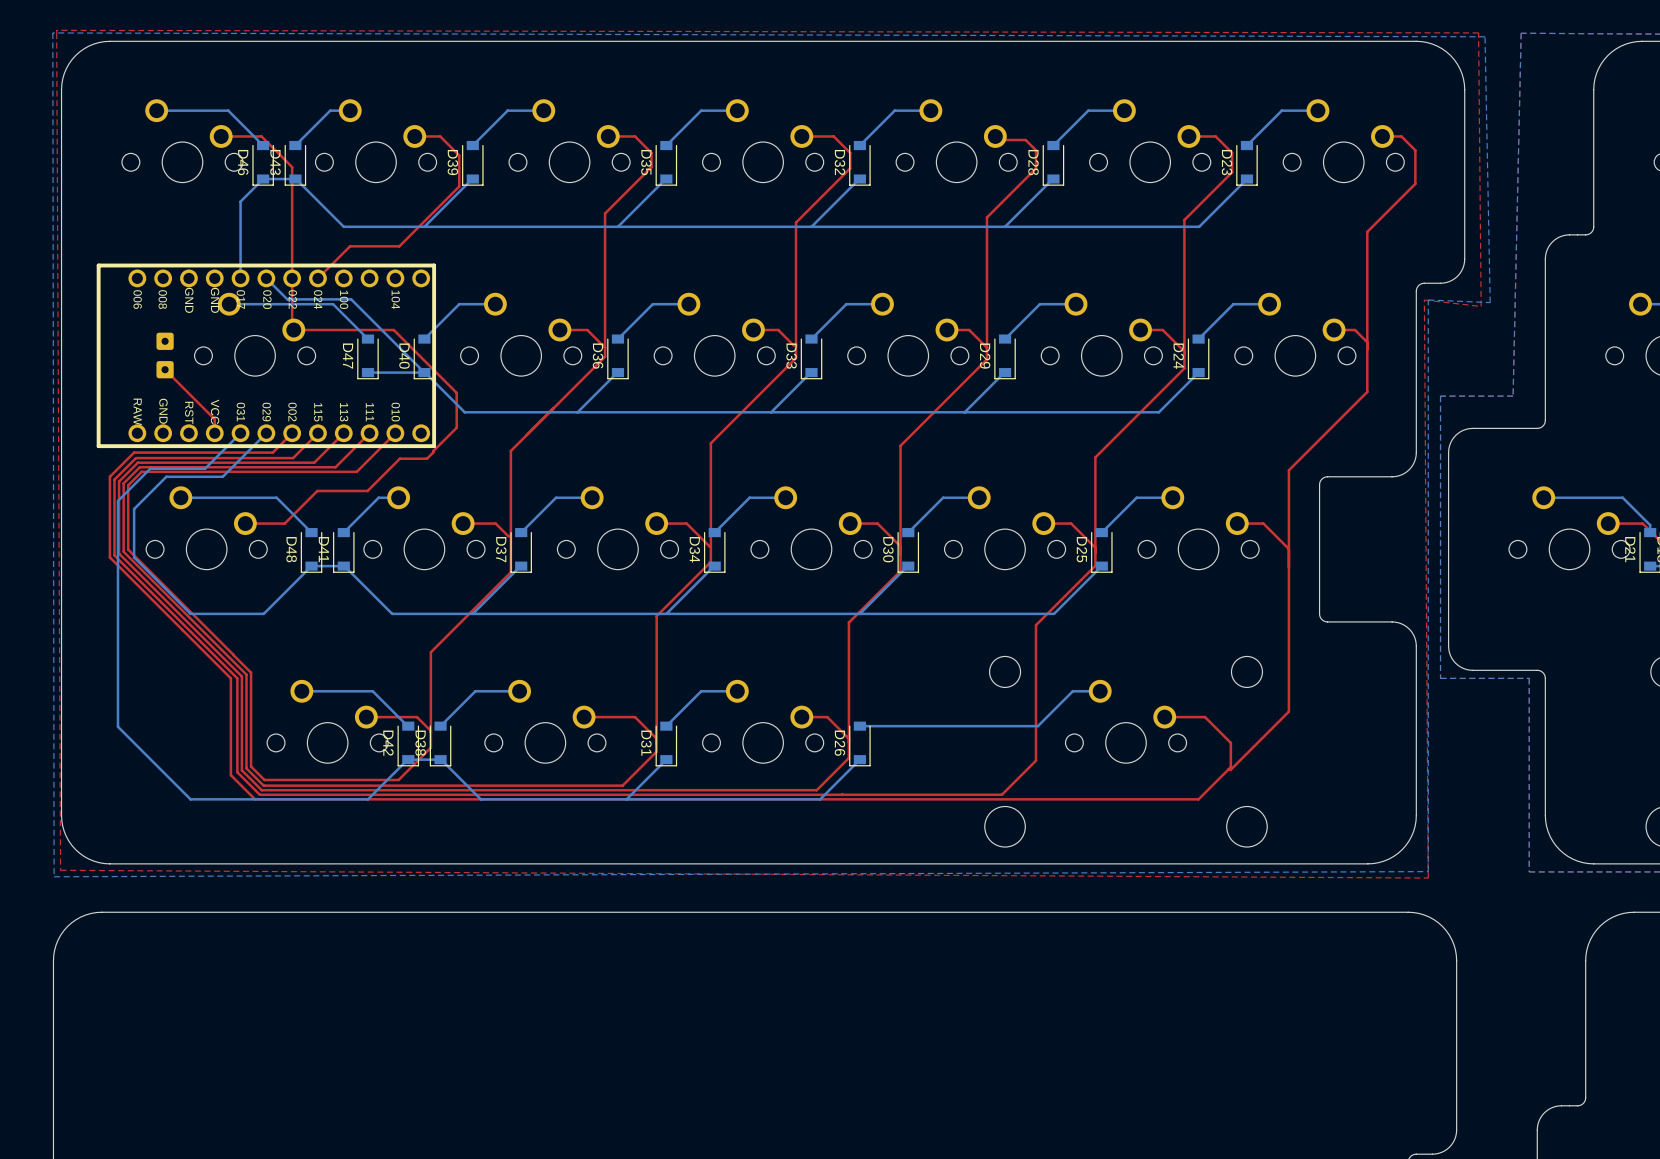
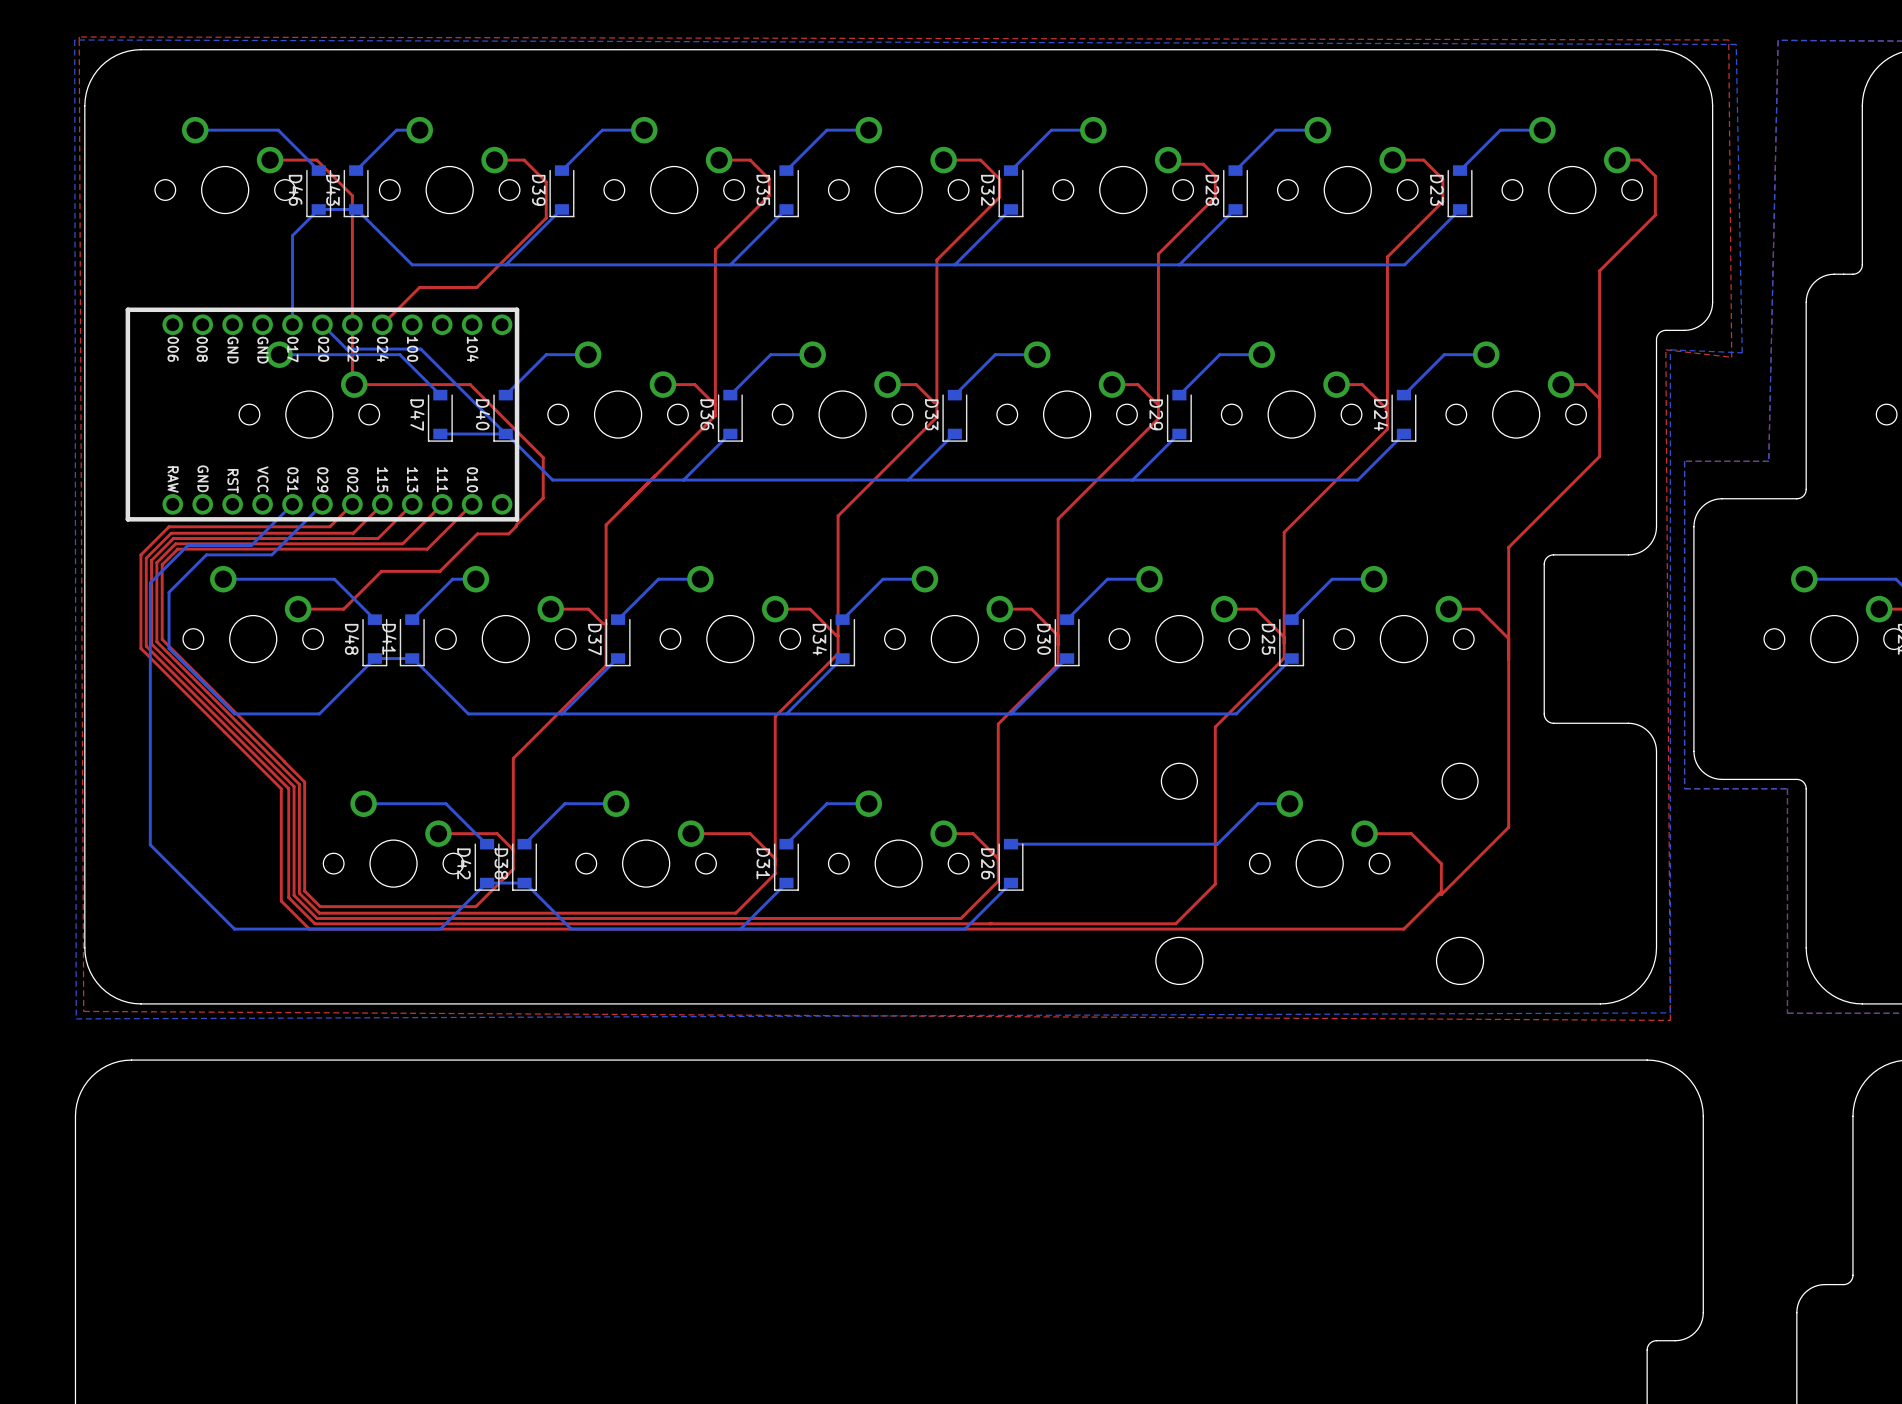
part: (165, 341) -> none
top track: (165, 369) (214, 419) (214, 433) -> none
part: (165, 369) -> none

